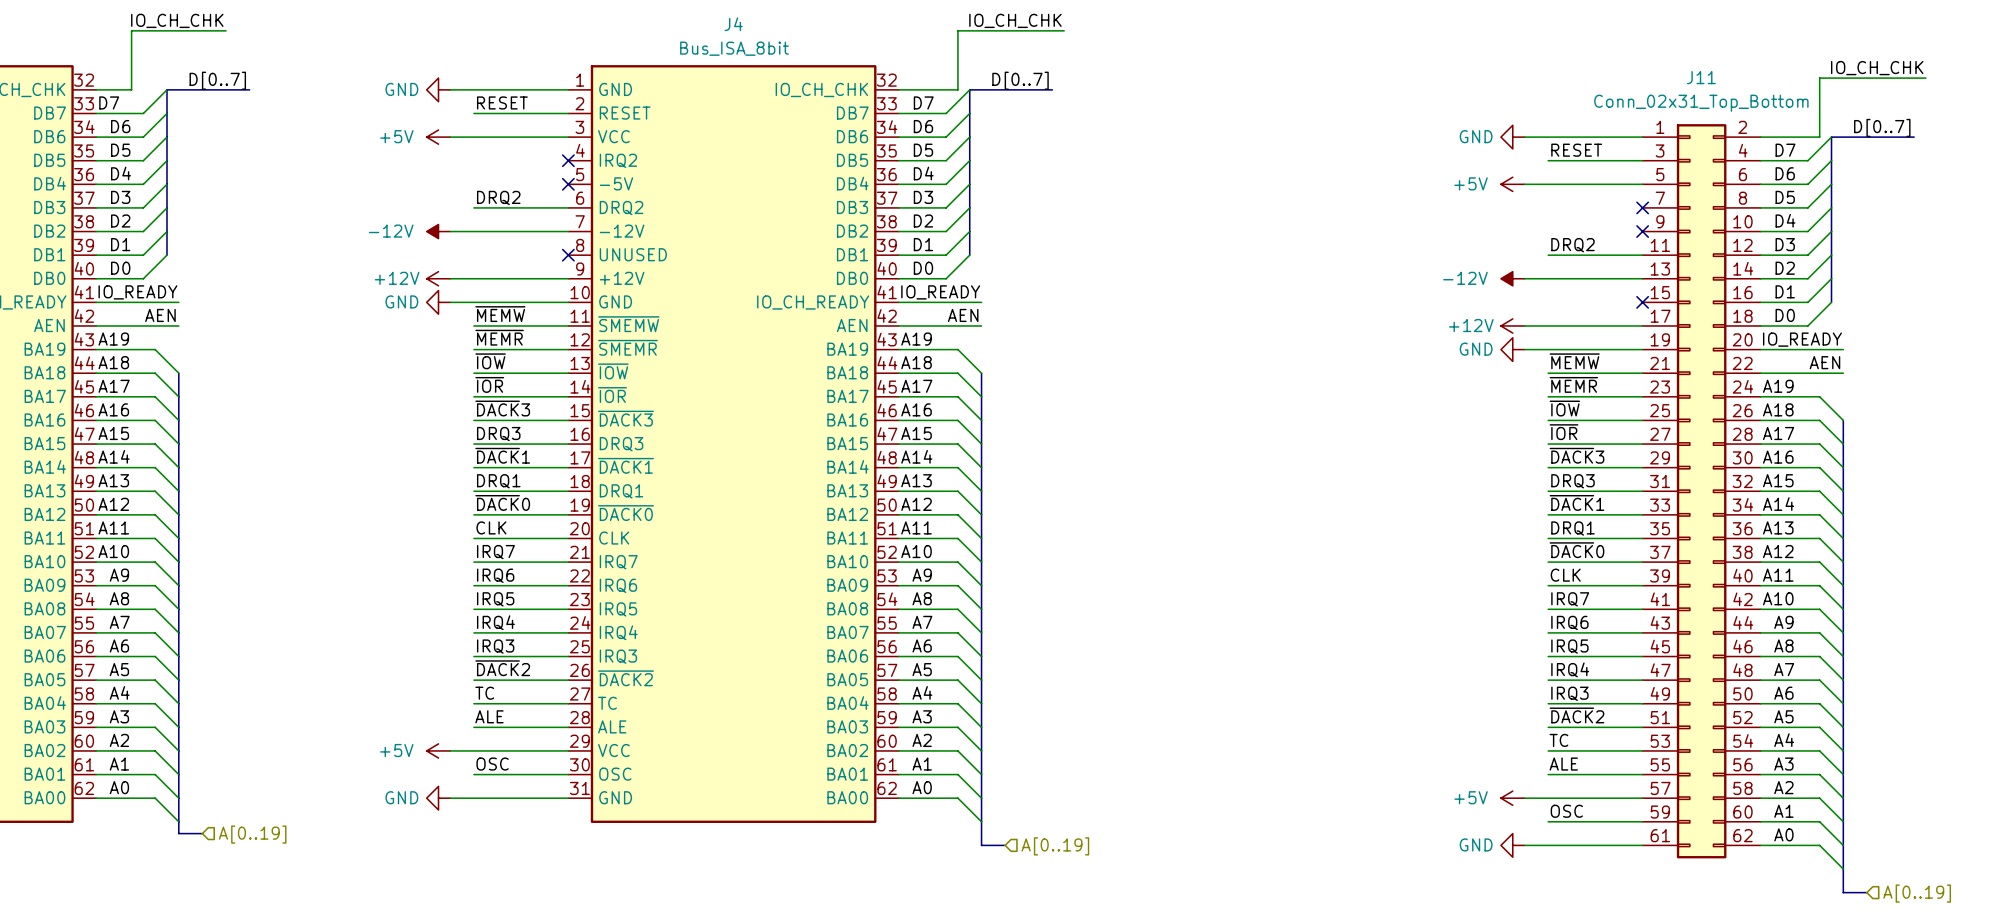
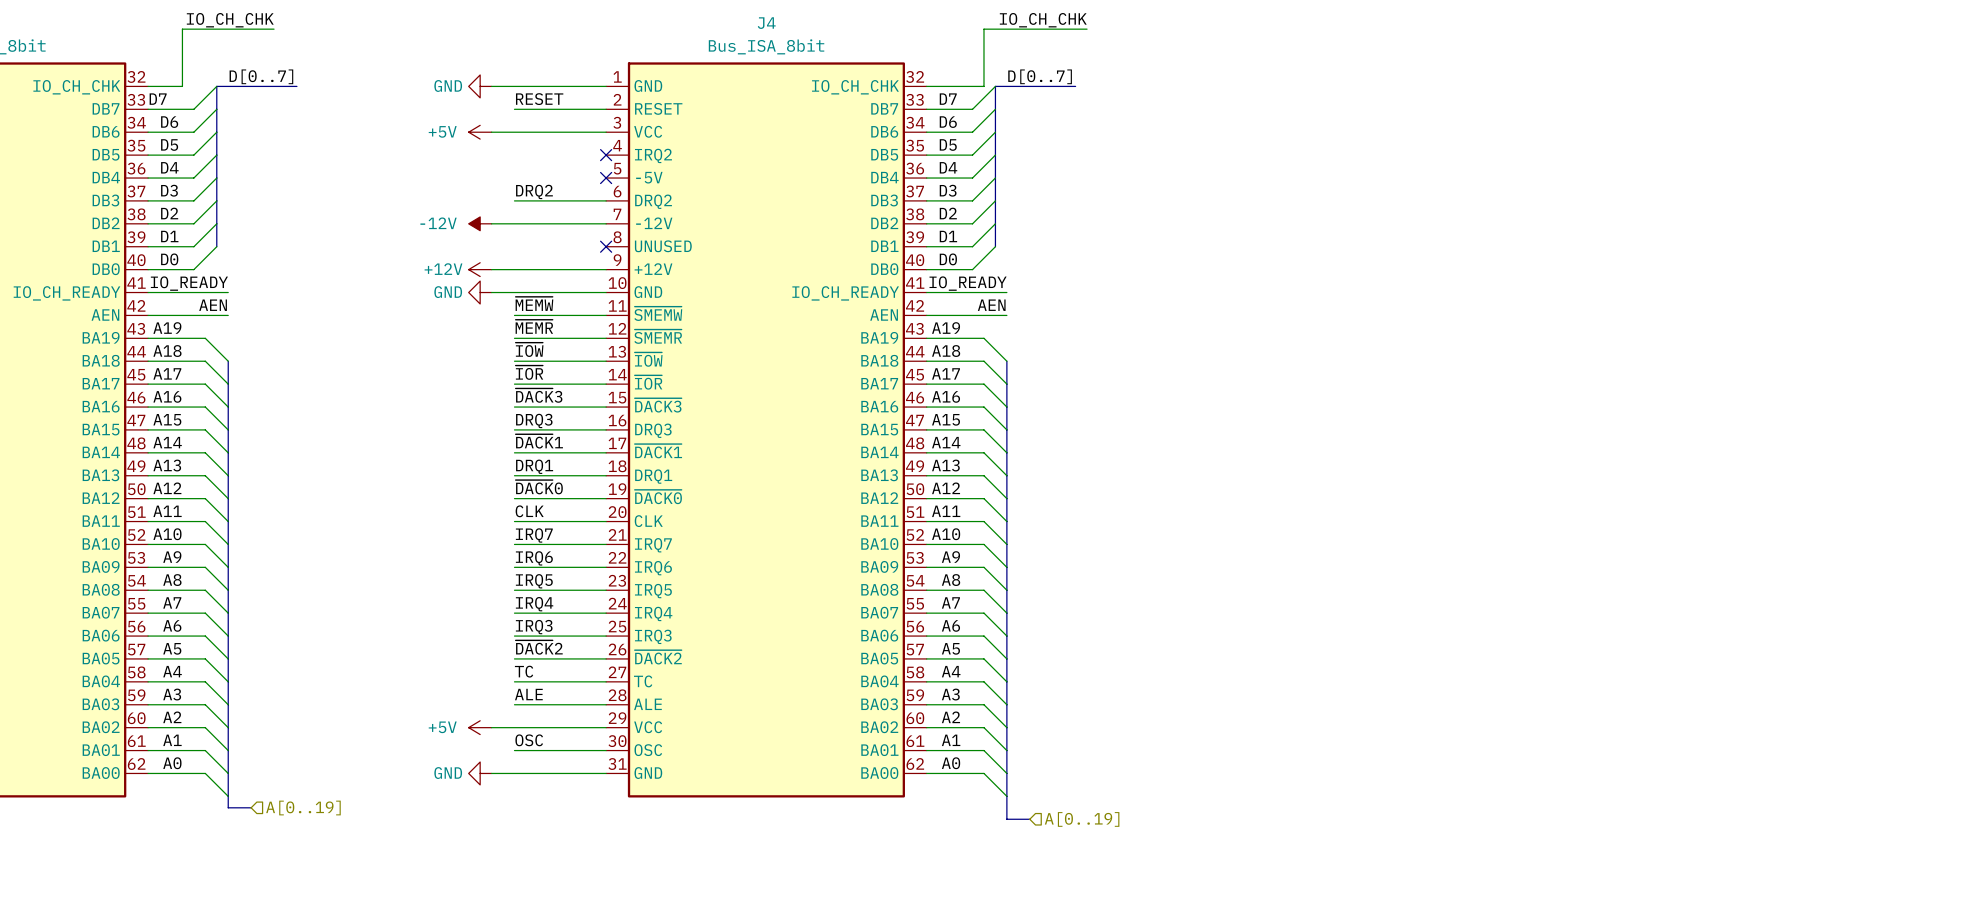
label: IO_CH_CHK (1877, 68) -> none
wire: (1925, 78) (1819, 78) (1819, 137) (1760, 137) -> none
label: D[0..7] (1882, 127) -> none
power symbol: GND (1512, 137) -> none
wire: (1524, 137) (1642, 137) -> none
wire: (1831, 137) (1807, 160) (1760, 160) -> none
bus: (1914, 137) (1831, 137) (1831, 302) -> none
label: RESET (1576, 150) -> none
label: D7 (1785, 150) -> none
wire: (1548, 160) (1642, 160) -> none
wire: (1831, 160) (1807, 184) (1760, 184) -> none
label: D6 (1785, 173) -> none
power symbol: +5V (1512, 184) -> none
wire: (1524, 184) (1642, 184) -> none
wire: (1831, 184) (1807, 207) (1760, 207) -> none
label: D5 (1785, 197) -> none
no-connect mark: (1642, 207) -> none
wire: (1831, 207) (1807, 231) (1760, 231) -> none
label: D4 (1785, 220) -> none
no-connect mark: (1642, 231) -> none
wire: (1831, 231) (1807, 255) (1760, 255) -> none
label: D3 (1785, 244) -> none
label: DRQ2 (1573, 245) -> none
wire: (1548, 255) (1642, 255) -> none
wire: (1831, 255) (1807, 278) (1760, 278) -> none
label: D2 (1785, 268) -> none
power symbol: -12V (1512, 278) -> none
wire: (1524, 278) (1642, 278) -> none
wire: (1831, 278) (1807, 302) (1760, 302) -> none
label: D1 (1785, 291) -> none
no-connect mark: (1642, 302) -> none
wire: (1831, 302) (1807, 325) (1760, 325) -> none
label: D0 (1785, 315) -> none
power symbol: +12V (1512, 325) -> none
wire: (1524, 325) (1642, 325) -> none
label: IO_READY (1802, 339) -> none
power symbol: GND (1512, 349) -> none
wire: (1524, 349) (1642, 349) -> none
wire: (1760, 349) (1843, 349) -> none
label: ~{MEMW} (1574, 361) -> none
label: AEN (1824, 362) -> none
wire: (1548, 373) (1642, 373) -> none
wire: (1760, 373) (1843, 373) -> none
label: ~{MEMR} (1573, 384) -> none
label: A19 (1778, 386) -> none
wire: (1548, 396) (1642, 396) -> none
wire: (1760, 396) (1819, 396) (1843, 420) -> none
label: ~{IOW} (1564, 408) -> none
label: A18 (1778, 409) -> none
wire: (1548, 420) (1642, 420) -> none
wire: (1760, 420) (1819, 420) (1843, 444) -> none
bus: (1843, 420) (1843, 892) (1866, 892) -> none
label: ~{IOR} (1564, 432) -> none
label: A17 (1778, 433) -> none
wire: (1548, 444) (1642, 444) -> none
wire: (1760, 444) (1819, 444) (1843, 467) -> none
label: ~{DACK}3 (1576, 455) -> none
label: A16 (1778, 457) -> none
wire: (1548, 467) (1642, 467) -> none
wire: (1760, 467) (1819, 467) (1843, 491) -> none
label: A15 (1778, 480) -> none
label: DRQ3 (1573, 481) -> none
wire: (1548, 491) (1642, 491) -> none
J11: Conn_02x31_Top_Bottom (1701, 491) -> none
wire: (1760, 491) (1819, 491) (1843, 514) -> none
label: ~{DACK}1 (1576, 502) -> none
label: A14 (1778, 504) -> none
wire: (1548, 514) (1642, 514) -> none
wire: (1760, 514) (1819, 514) (1843, 538) -> none
label: A13 (1778, 527) -> none
label: DRQ1 (1573, 528) -> none
wire: (1548, 538) (1642, 538) -> none
wire: (1760, 538) (1819, 538) (1843, 562) -> none
label: ~{DACK}0 (1576, 550) -> none
label: A12 (1778, 551) -> none
wire: (1548, 562) (1642, 562) -> none
wire: (1760, 562) (1819, 562) (1843, 585) -> none
label: CLK (1565, 575) -> none
label: A11 (1778, 575) -> none
wire: (1548, 585) (1642, 585) -> none
wire: (1760, 585) (1819, 585) (1843, 609) -> none
label: A10 (1778, 598) -> none
label: IRQ7 (1570, 599) -> none
wire: (1548, 609) (1642, 609) -> none
wire: (1760, 609) (1819, 609) (1843, 632) -> none
label: IRQ6 (1569, 622) -> none
label: A9 (1783, 622) -> none
wire: (1548, 632) (1642, 632) -> none
wire: (1760, 632) (1819, 632) (1843, 656) -> none
label: A8 (1783, 645) -> none
label: IRQ5 (1569, 646) -> none
wire: (1548, 656) (1642, 656) -> none
wire: (1760, 656) (1819, 656) (1843, 680) -> none
label: IRQ4 (1570, 669) -> none
label: A7 (1784, 669) -> none
wire: (1548, 680) (1642, 680) -> none
wire: (1760, 680) (1819, 680) (1843, 703) -> none
label: IRQ3 (1569, 693) -> none
label: A6 (1783, 693) -> none
wire: (1548, 703) (1642, 703) -> none
wire: (1760, 703) (1819, 703) (1843, 727) -> none
label: ~{DACK}2 (1576, 715) -> none
label: A5 (1783, 716) -> none
wire: (1548, 727) (1642, 727) -> none
wire: (1760, 727) (1819, 727) (1843, 750) -> none
label: TC (1558, 740) -> none
label: A4 (1784, 740) -> none
wire: (1548, 750) (1642, 750) -> none
wire: (1760, 750) (1819, 750) (1843, 774) -> none
label: ALE (1563, 764) -> none
label: A3 (1783, 764) -> none
wire: (1548, 774) (1642, 774) -> none
wire: (1760, 774) (1819, 774) (1843, 798) -> none
label: A2 (1783, 787) -> none
power symbol: +5V (1512, 798) -> none
wire: (1524, 798) (1642, 798) -> none
wire: (1760, 798) (1819, 798) (1843, 821) -> none
label: OSC (1566, 811) -> none
label: A1 (1783, 811) -> none
wire: (1548, 821) (1642, 821) -> none
wire: (1760, 821) (1819, 821) (1843, 845) -> none
label: A0 (1783, 834) -> none
power symbol: GND (1512, 845) -> none
wire: (1524, 845) (1642, 845) -> none
wire: (1760, 845) (1819, 845) (1843, 869) -> none
hierarchical label: A[0..19] (1917, 893) -> none

